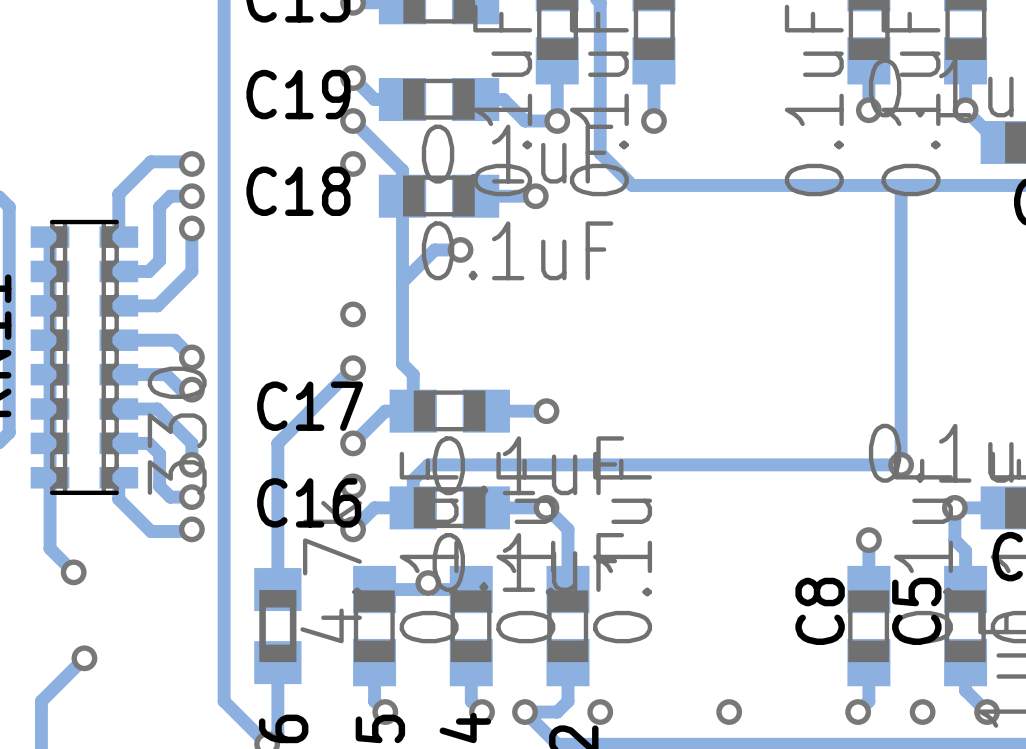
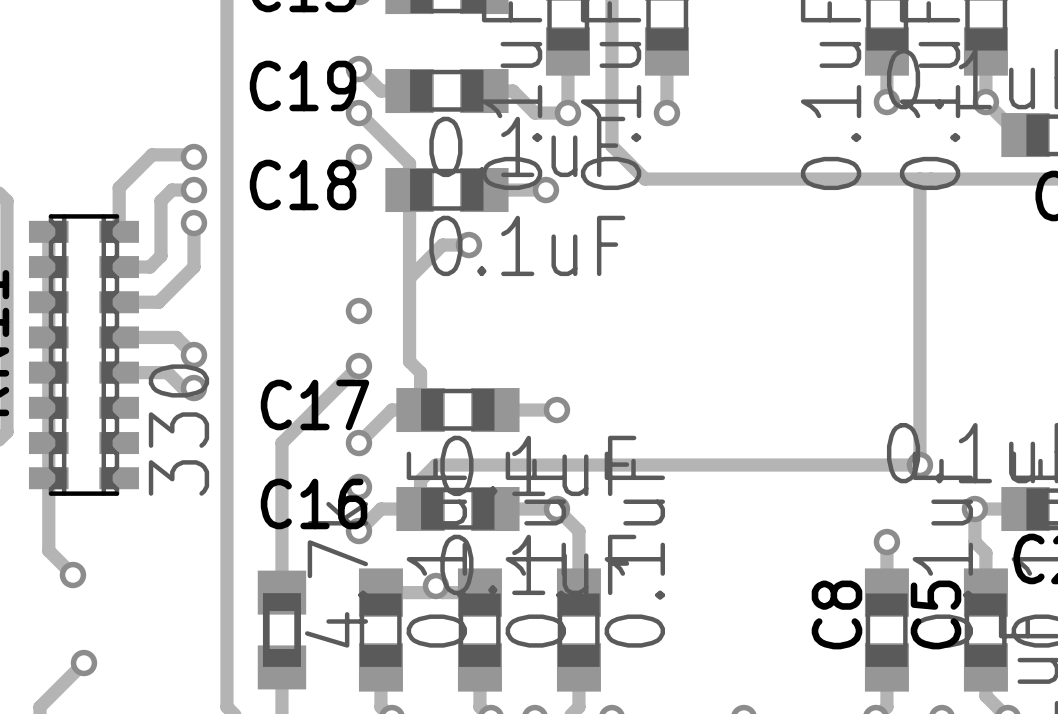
track: (118, 409) (157, 409) (191, 443) (191, 464) -> none
track: (118, 443) (148, 443) (159, 454) (159, 486) (170, 497) (191, 497) -> none
via: (191, 464) -> none
track: (118, 477) (118, 499) (151, 531) (189, 531) (191, 529) -> none
via: (191, 497) -> none
via: (191, 529) -> none

